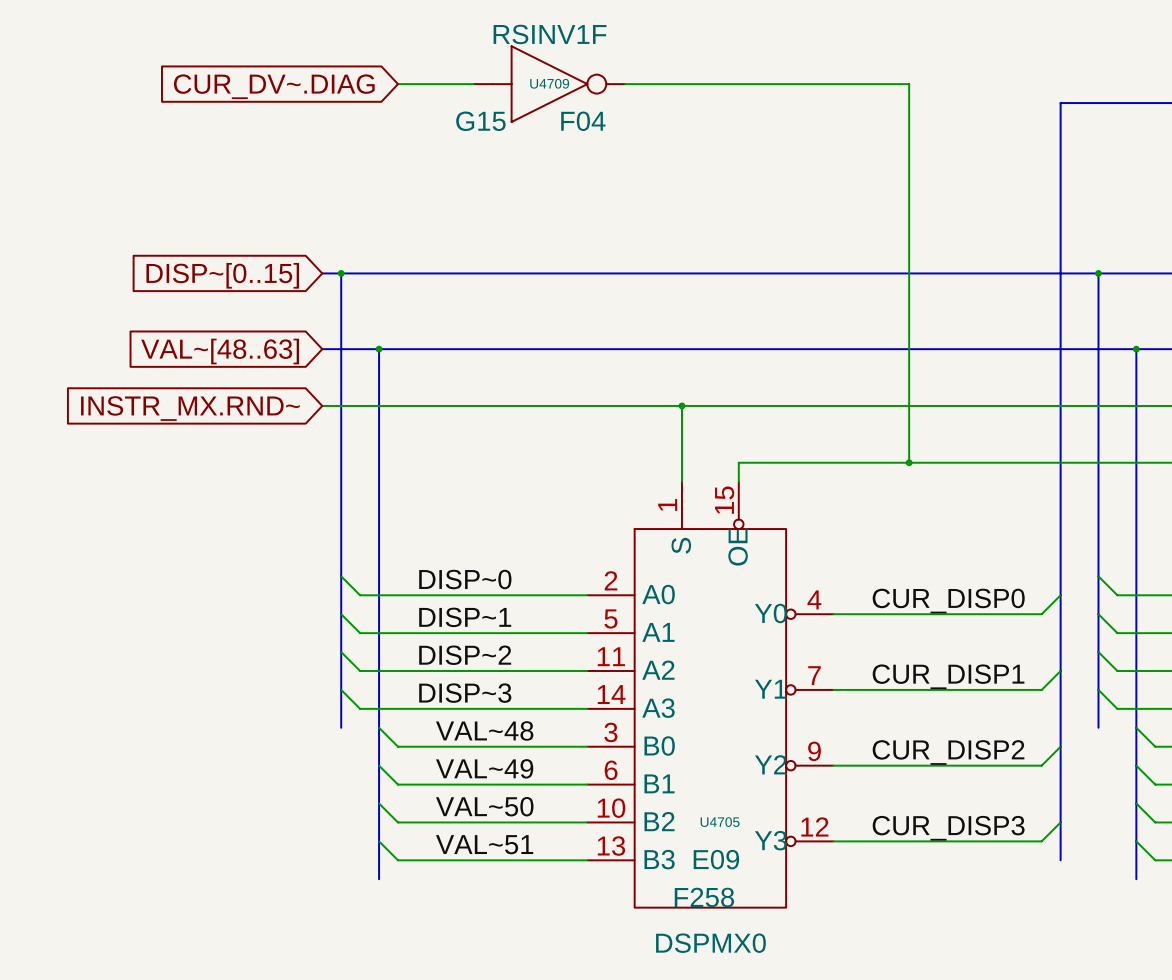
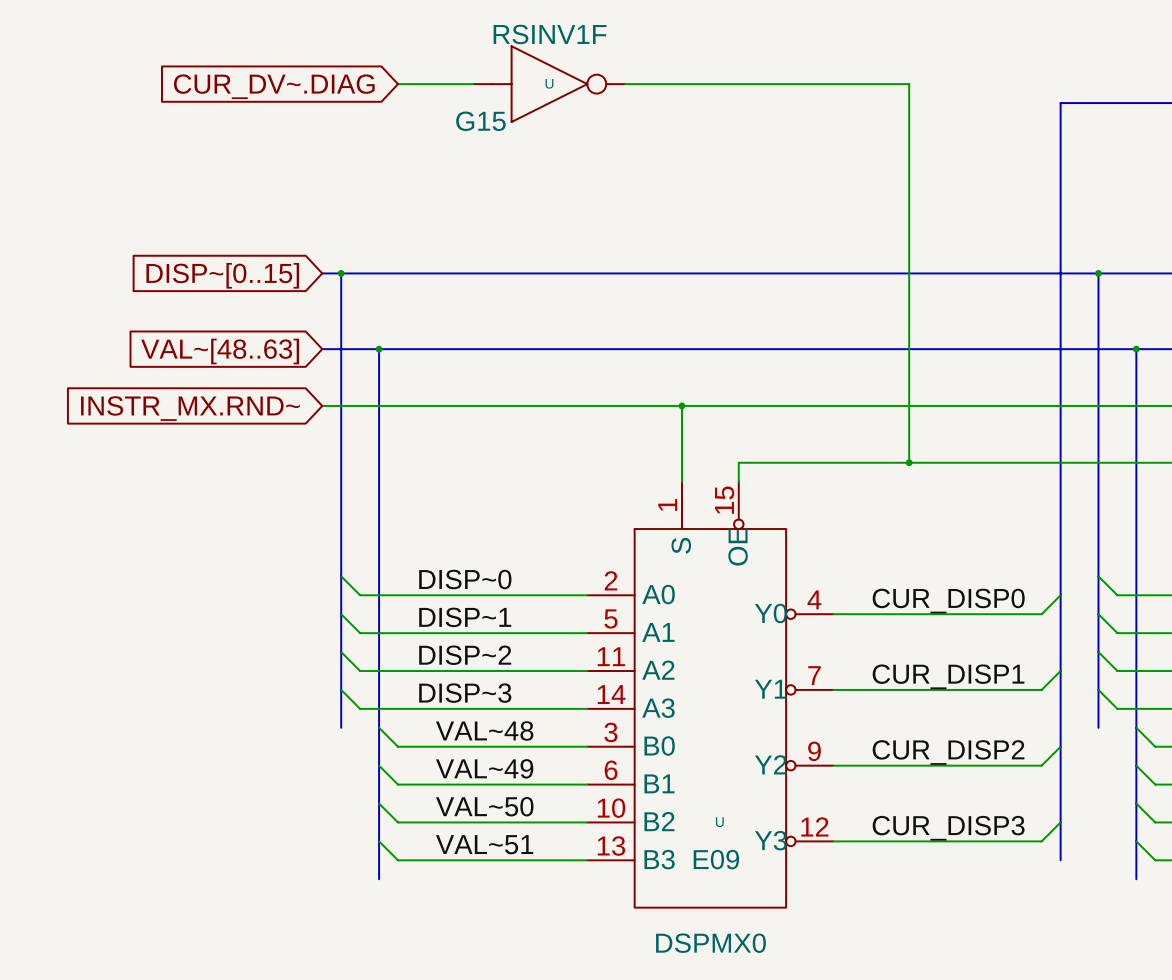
U4709 name: U4709 (549, 83) -> U (549, 83)
U4709 value: F04 (583, 121) -> none
U4705 name: U4705 (720, 822) -> U (719, 822)
U4705 value: F258 (704, 897) -> none

